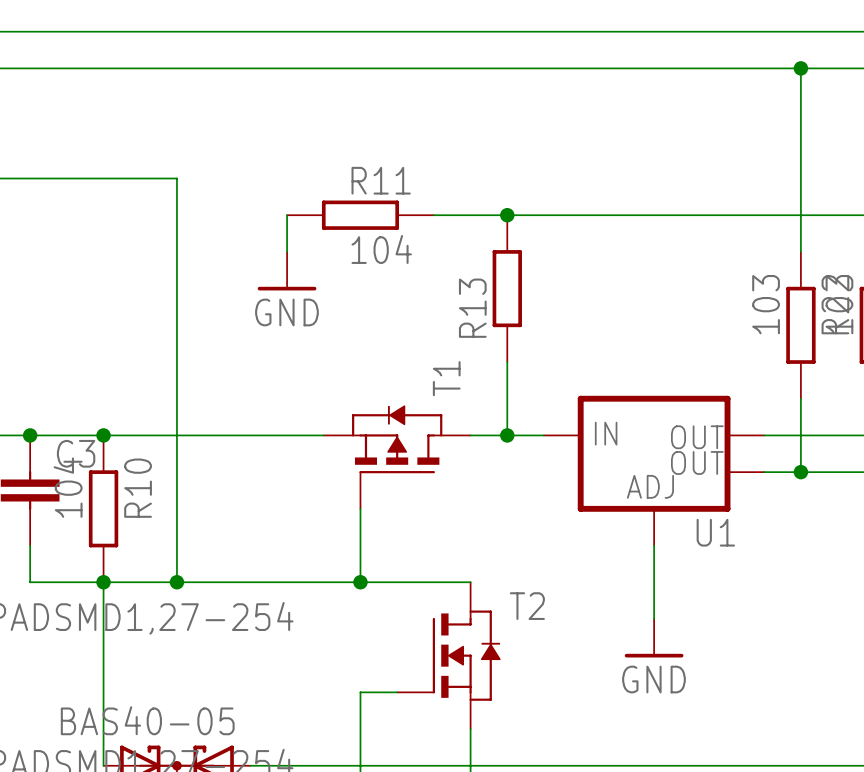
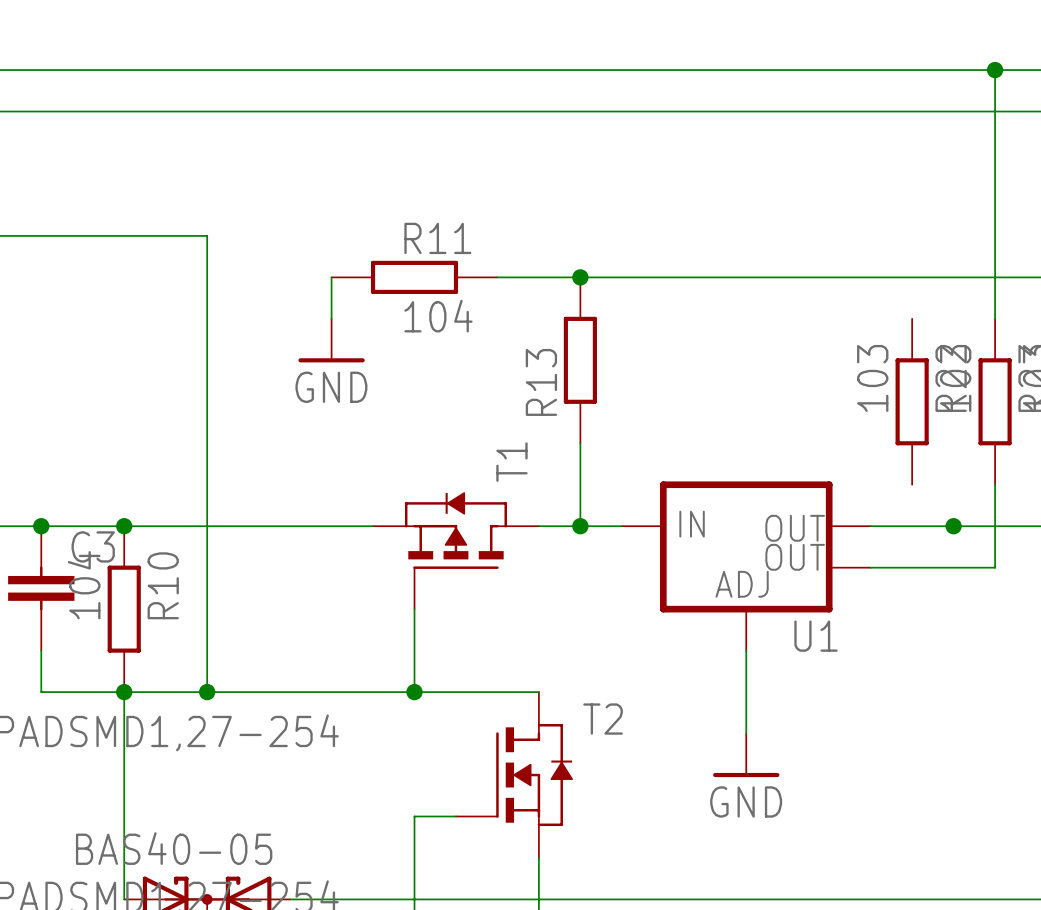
wire: (800, 68) (800, 251) -> none
junction: (800, 68) -> none
wire: (800, 398) (800, 472) -> none
junction position: (800, 472) -> (953, 526)

